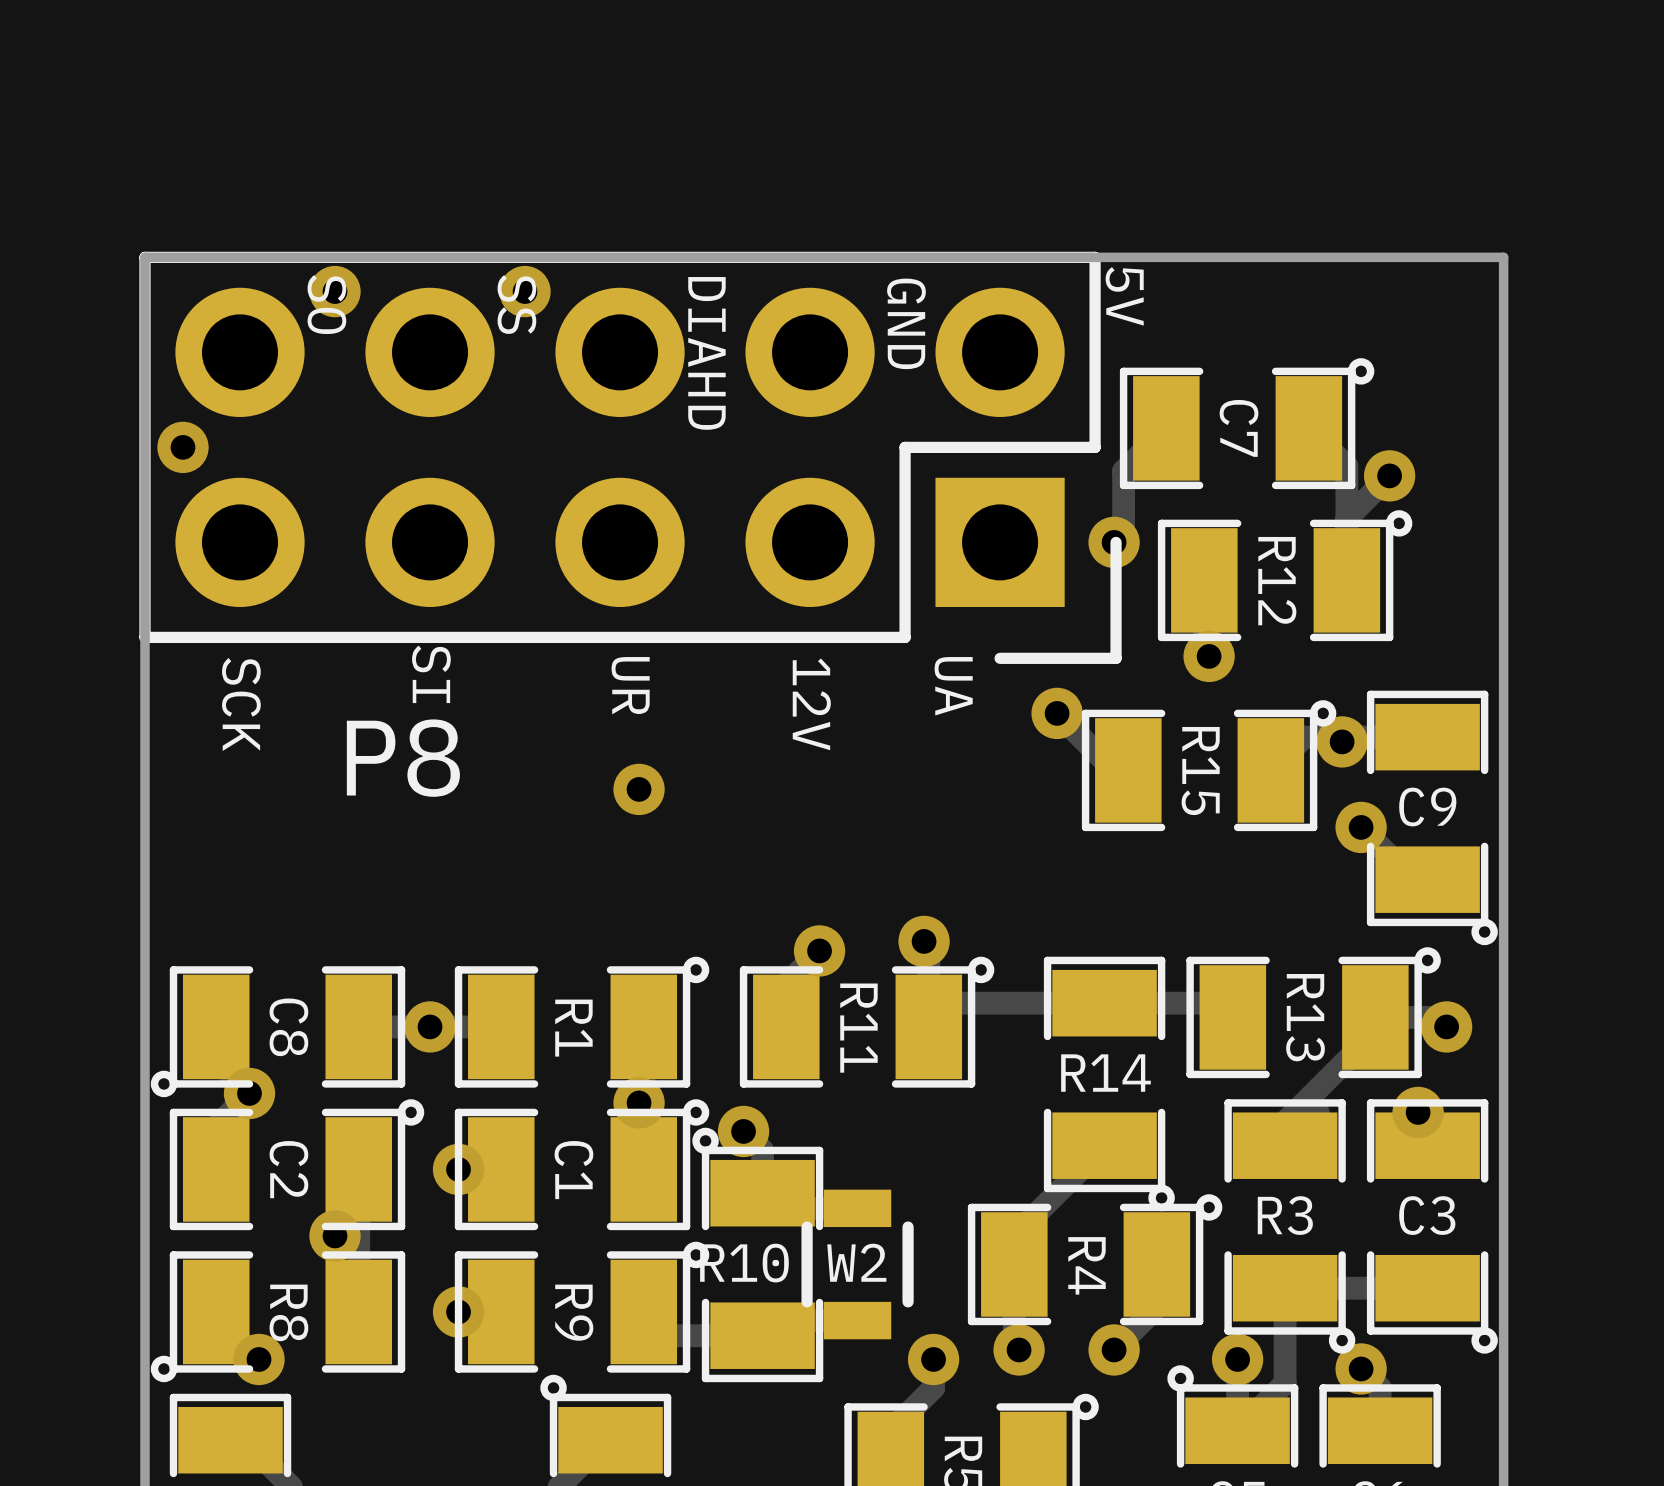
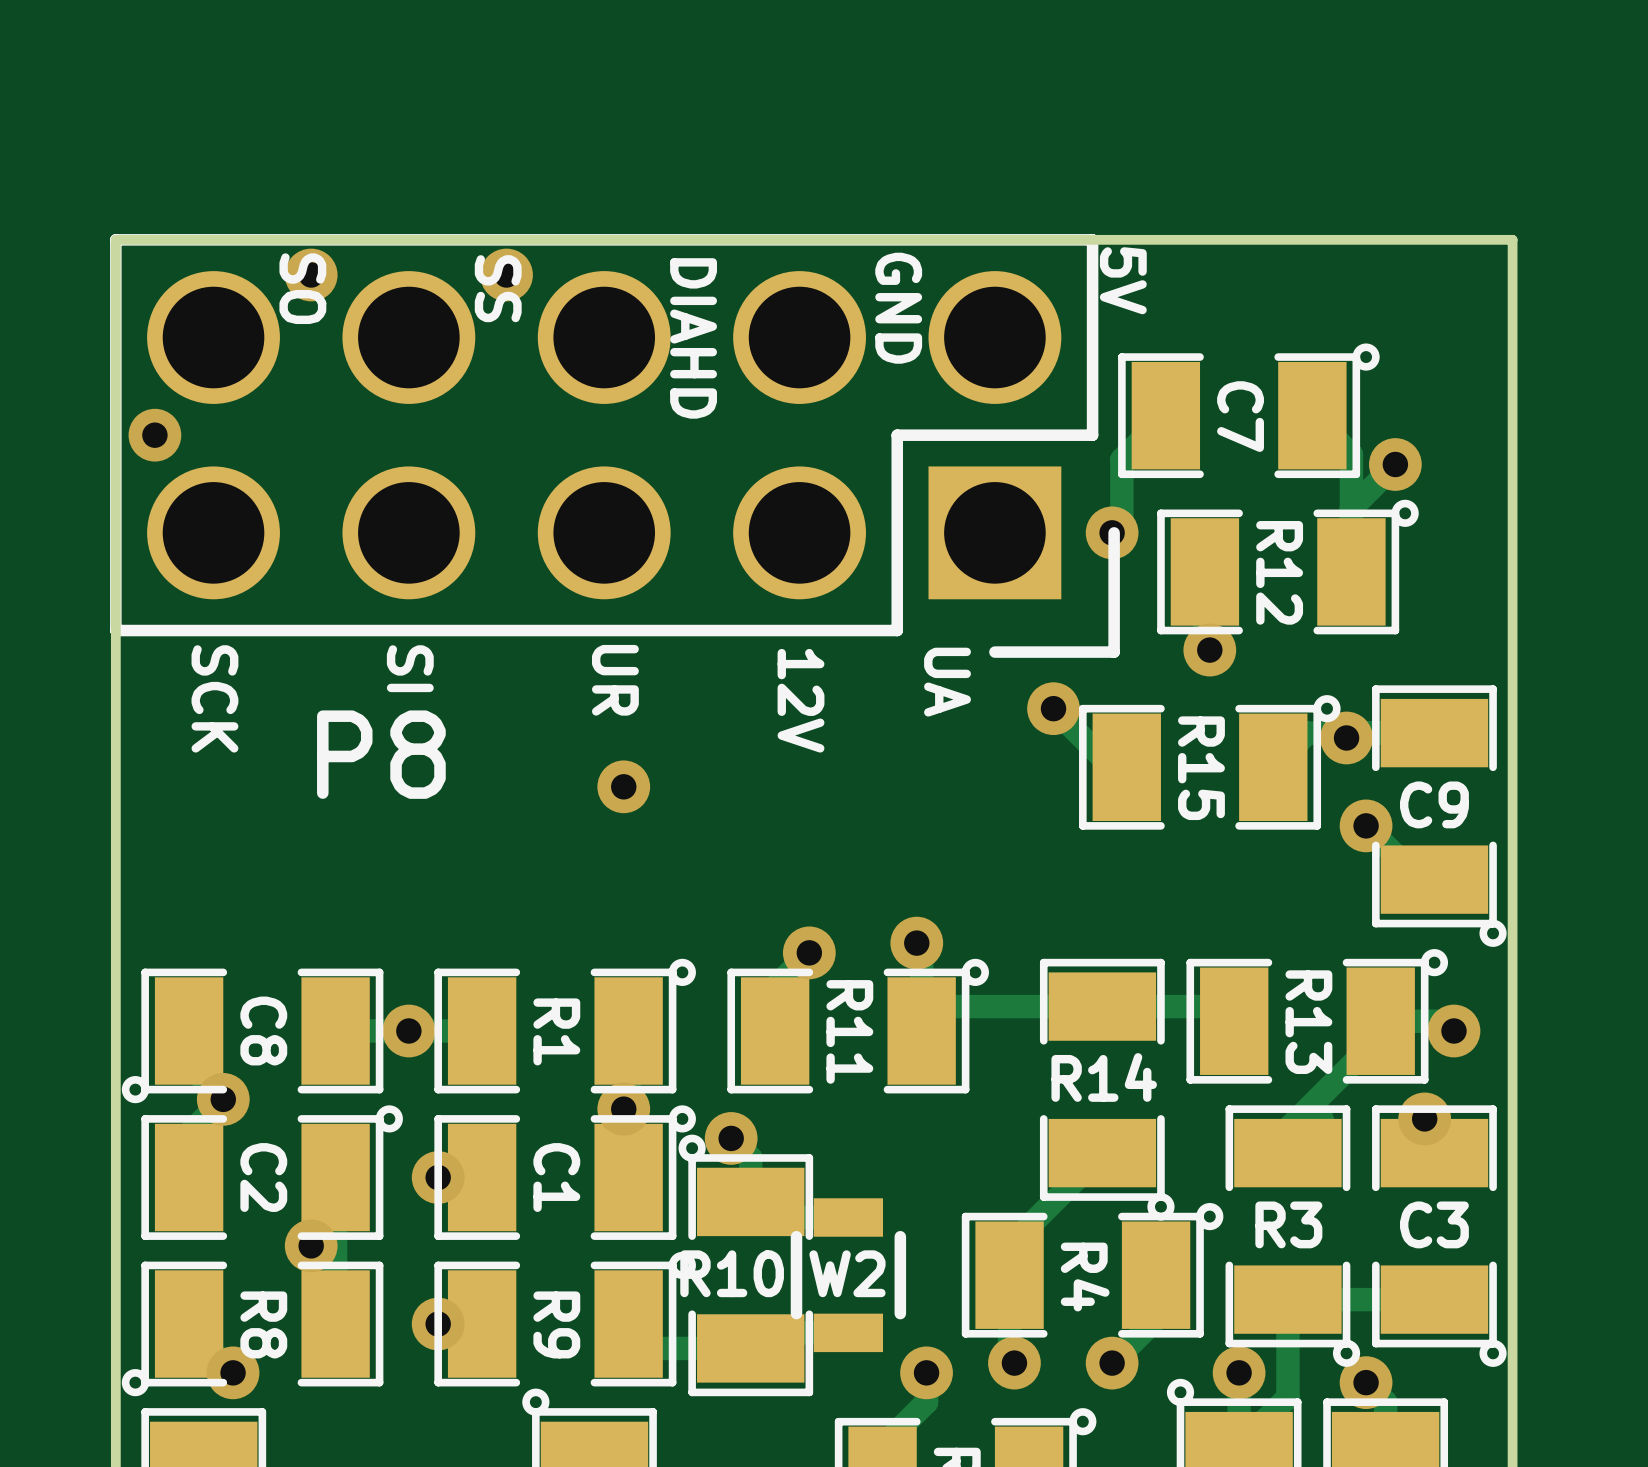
P8 footprint: [139, 251, 1122, 664] -> [110, 234, 1120, 658]

